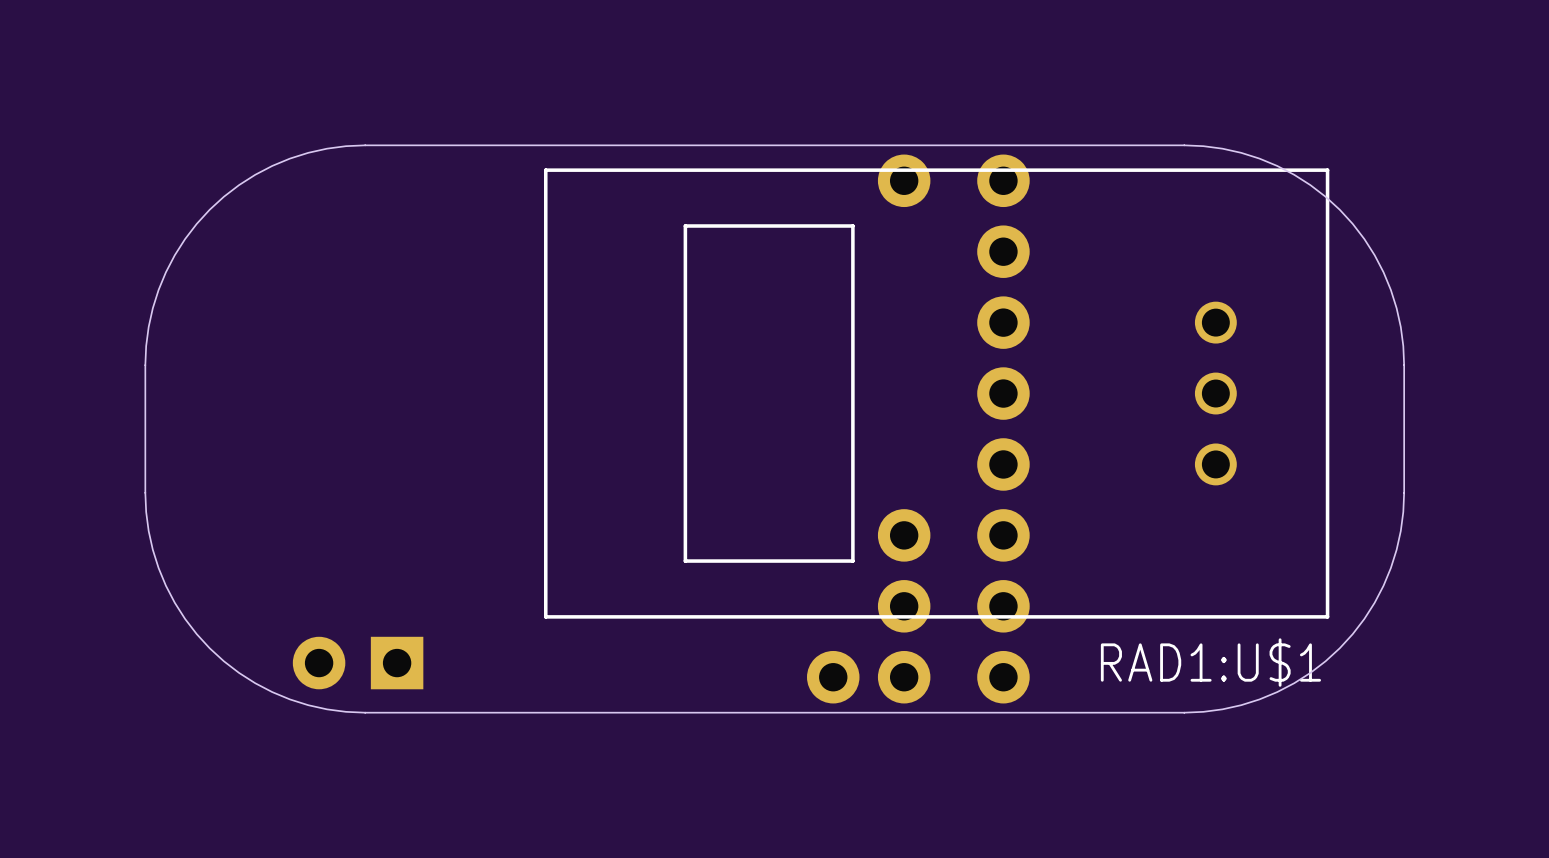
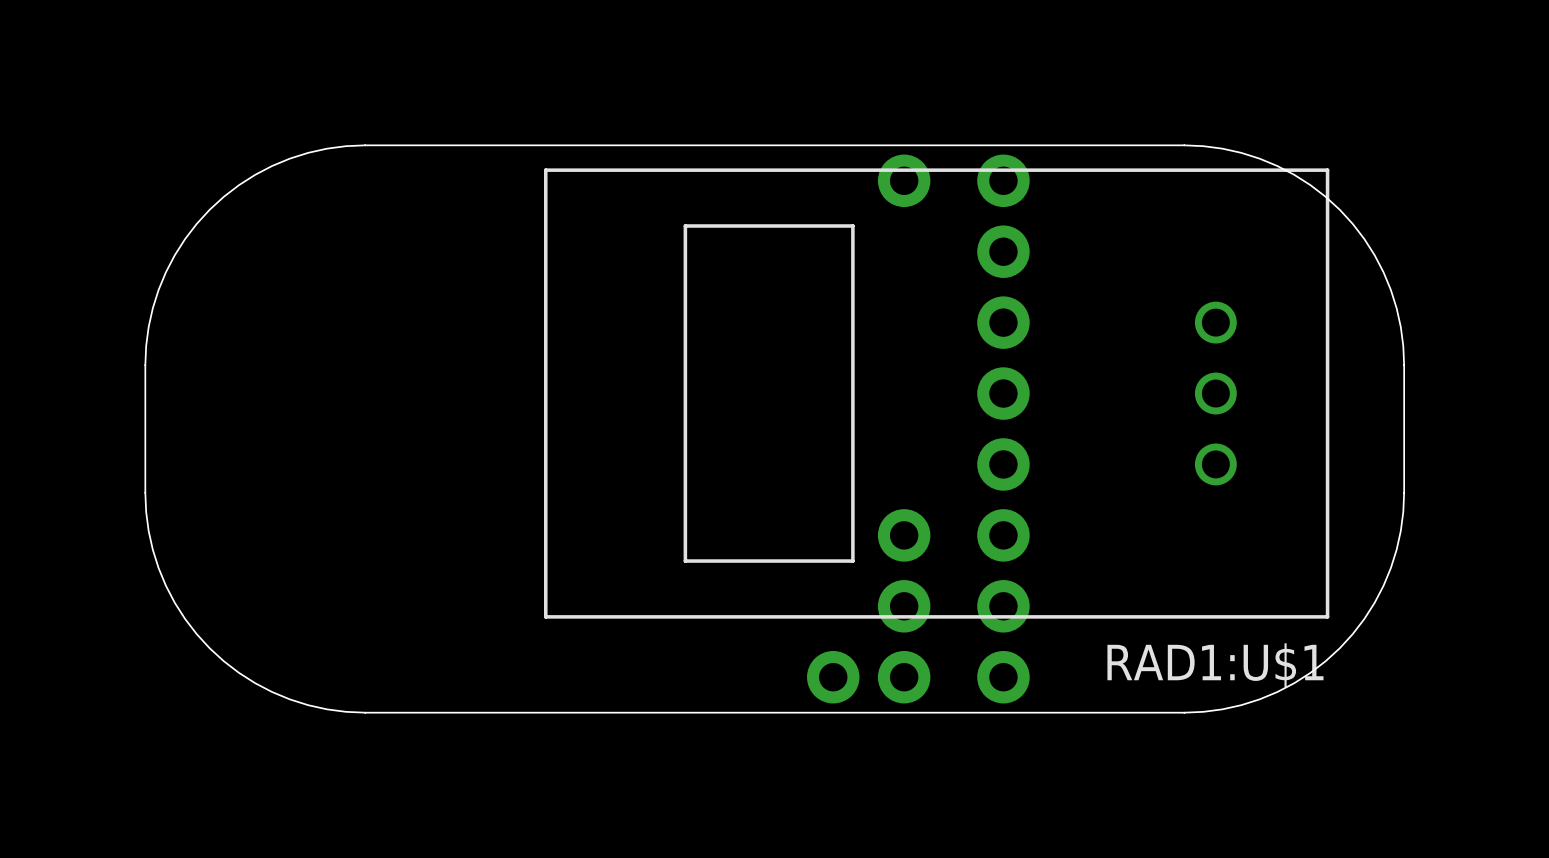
part: (358, 663) -> none

